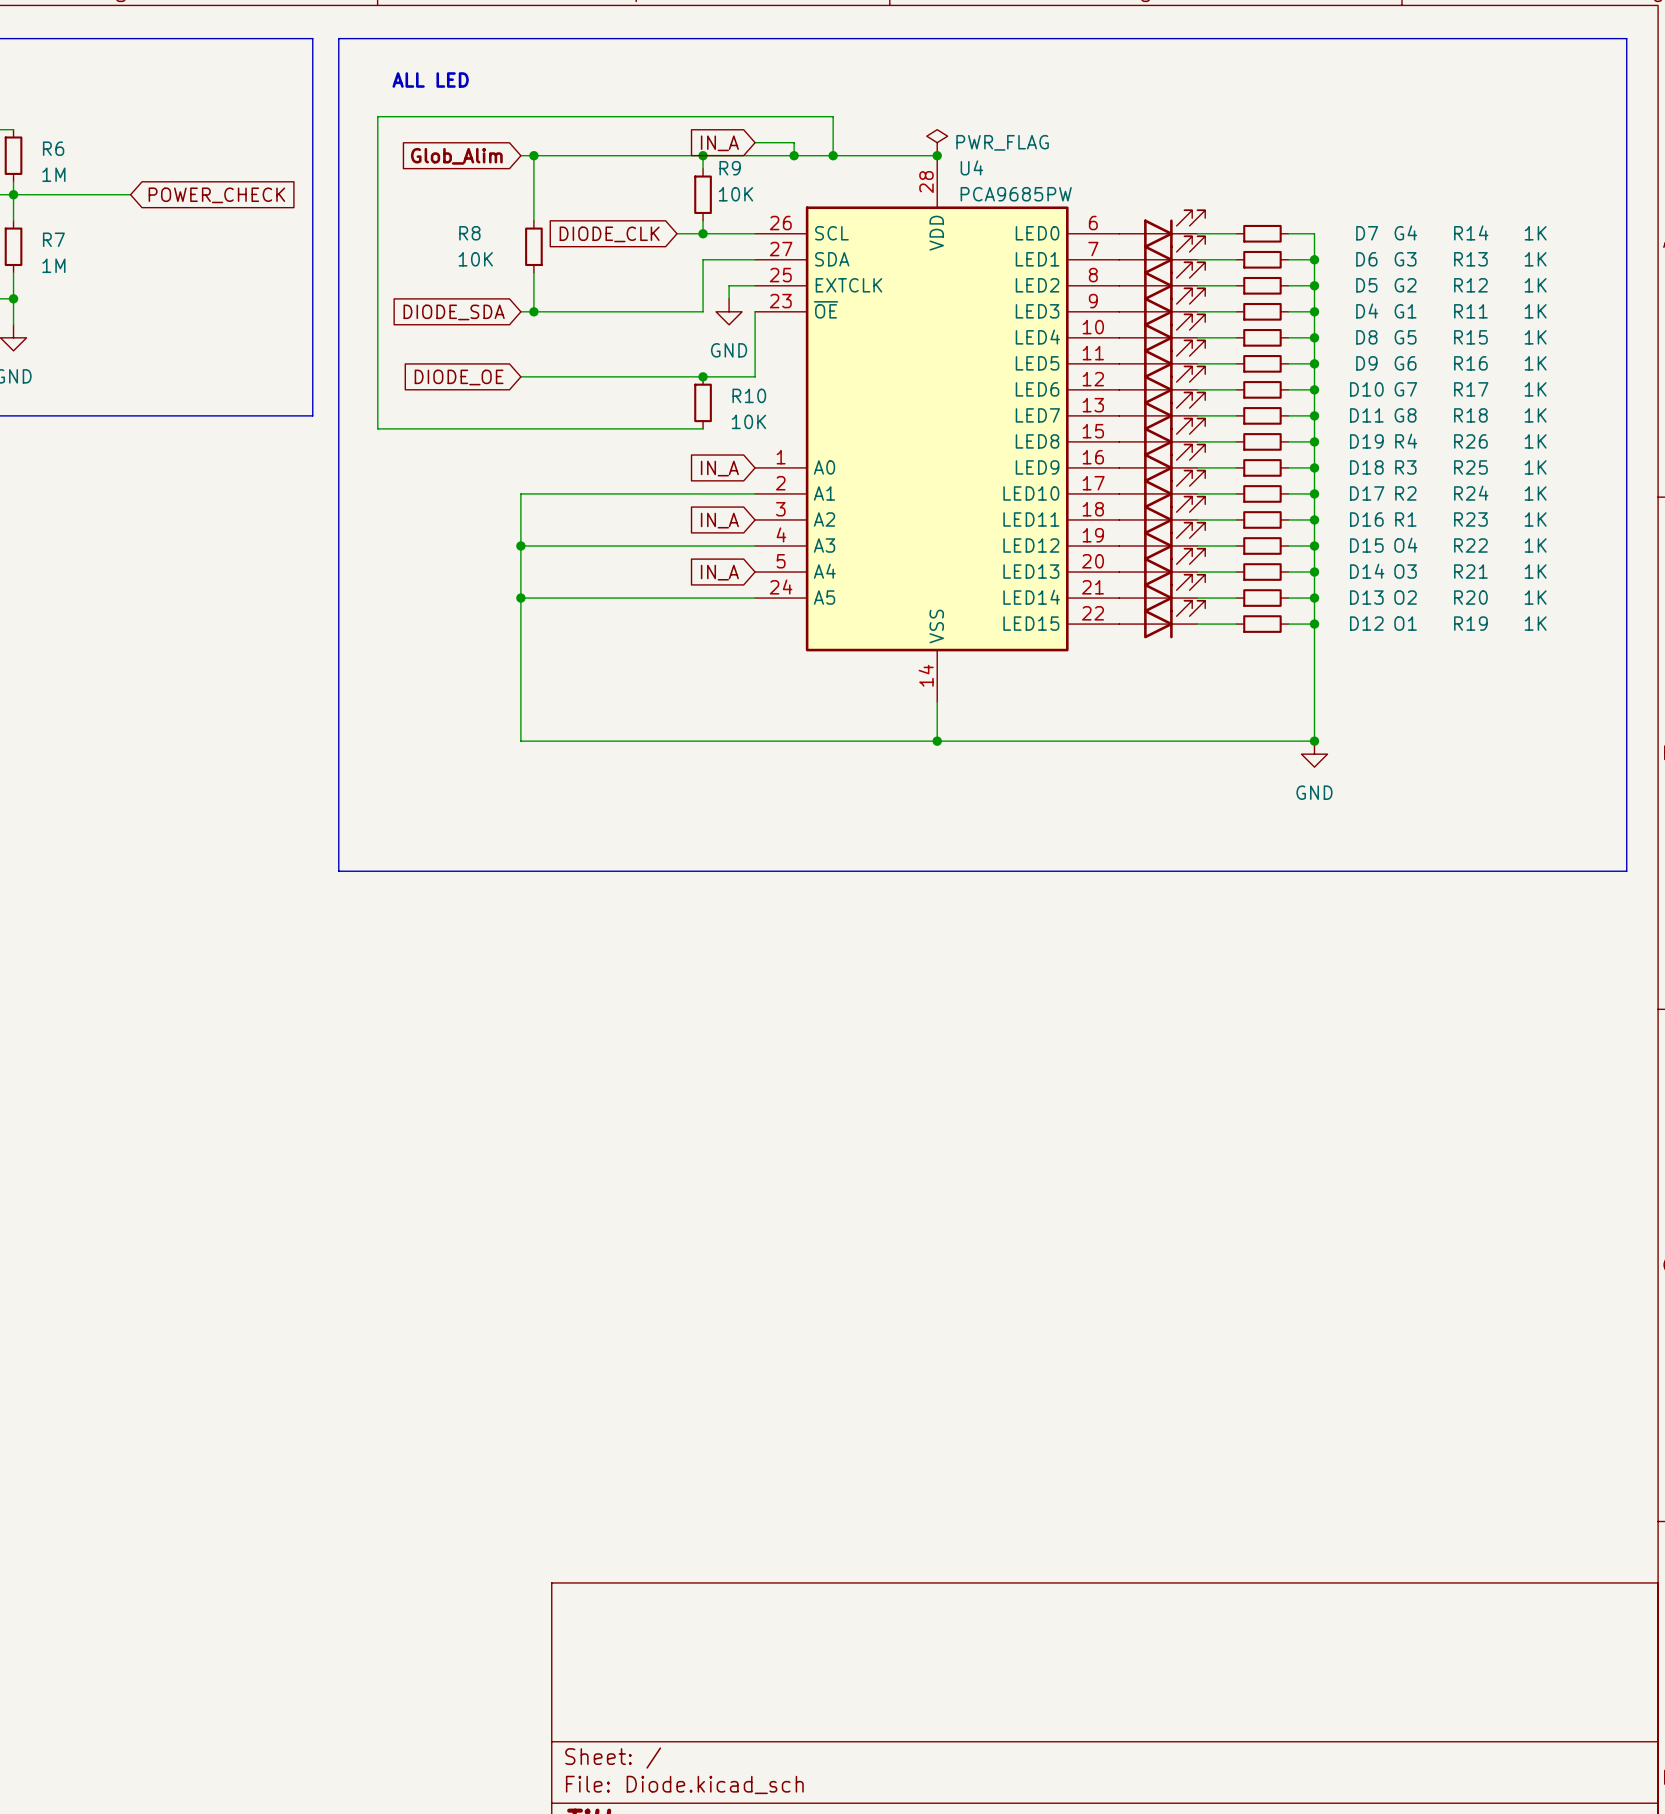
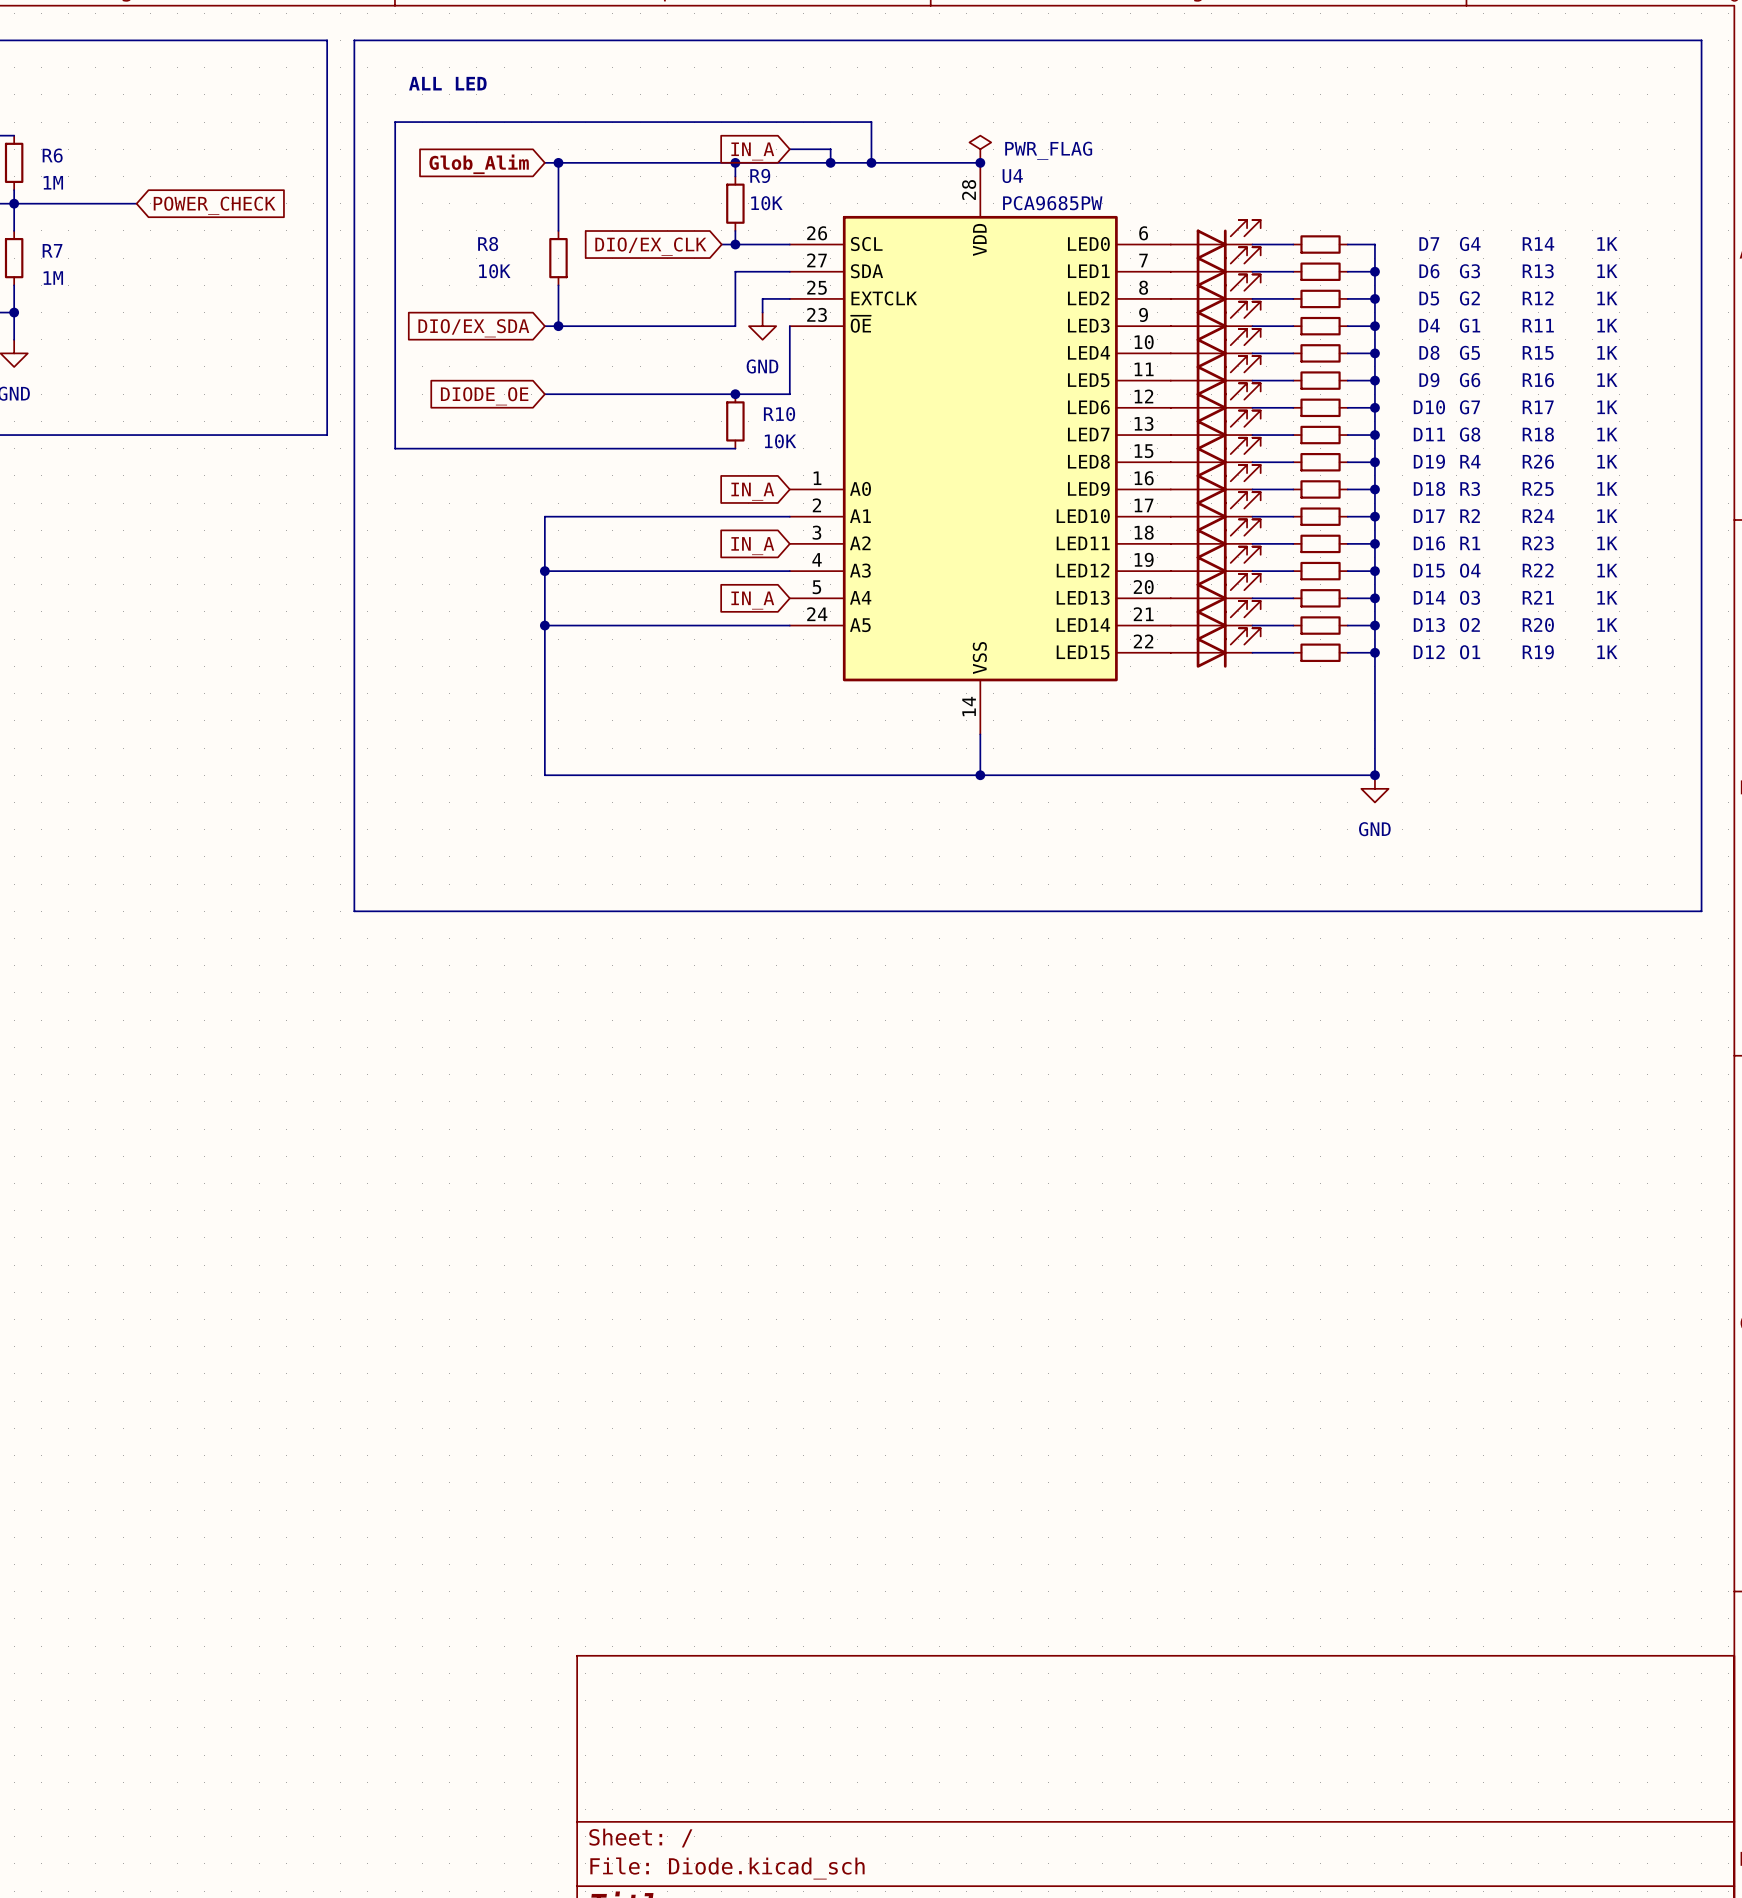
wire: (677, 233) (690, 233) -> none
global label: DIODE_CLK (609, 234) -> DIO/EX_CLK (650, 246)
global label: DIODE_SDA (454, 312) -> DIO/EX_SDA (473, 328)

